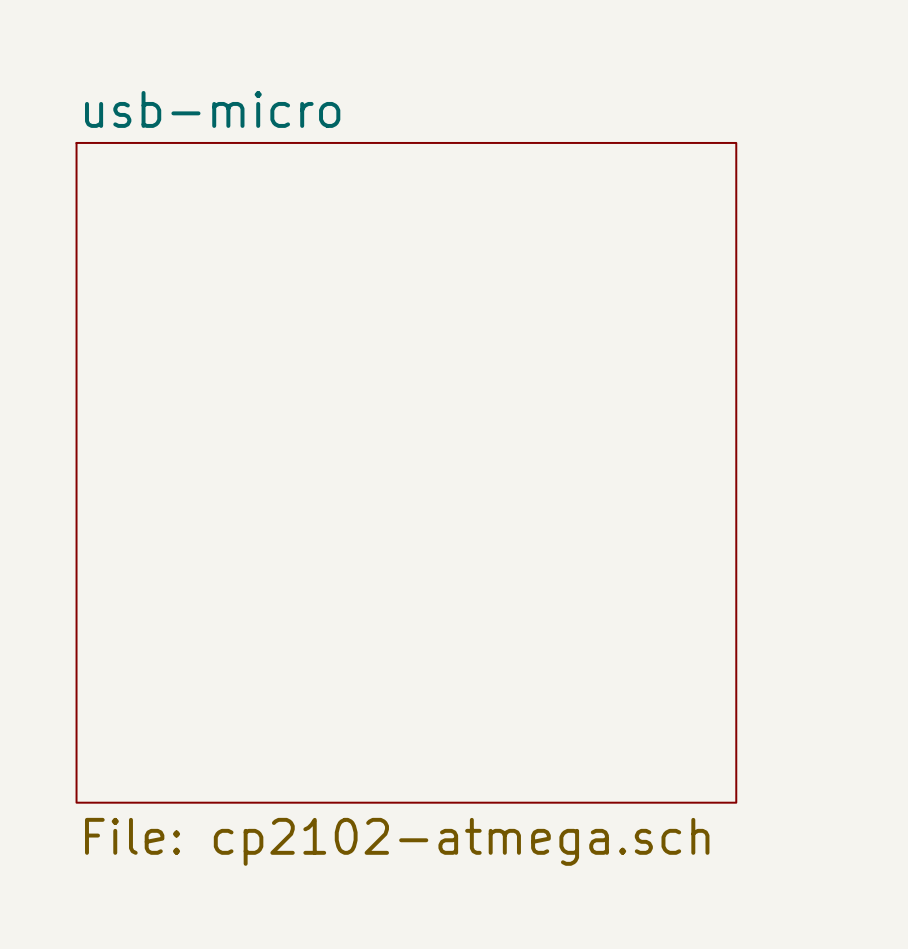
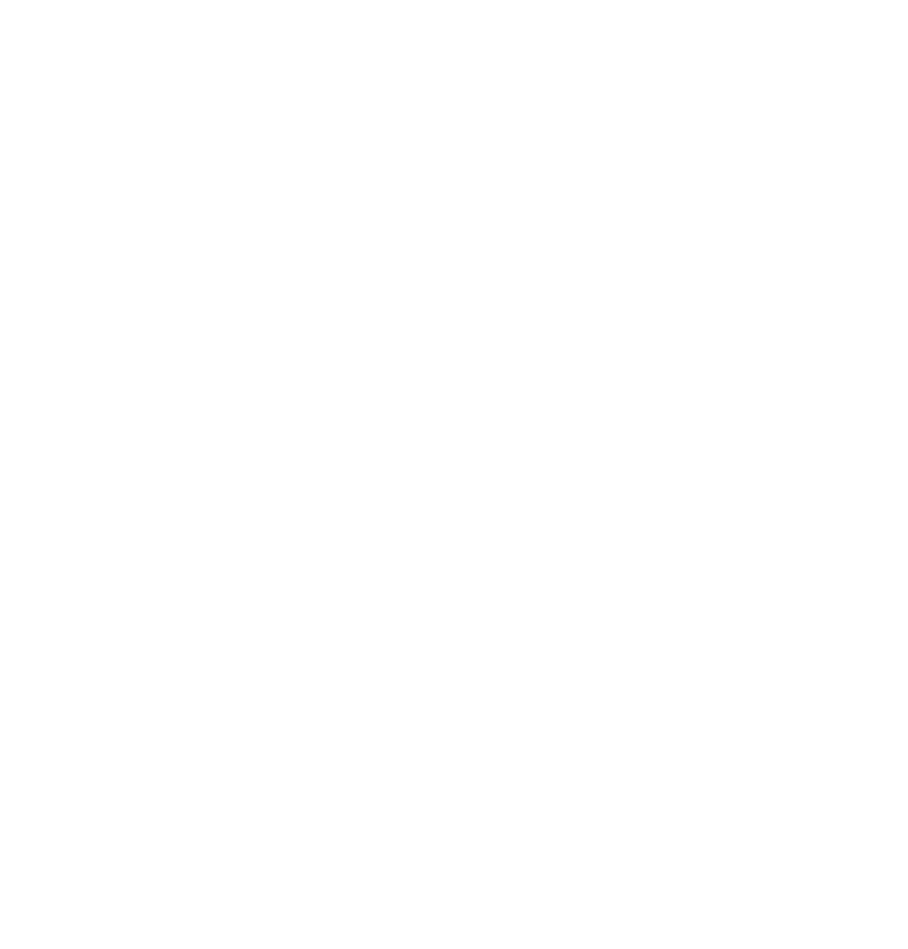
sheet usb-micro: File: cp2102-atmega.sch (406, 472) -> none

